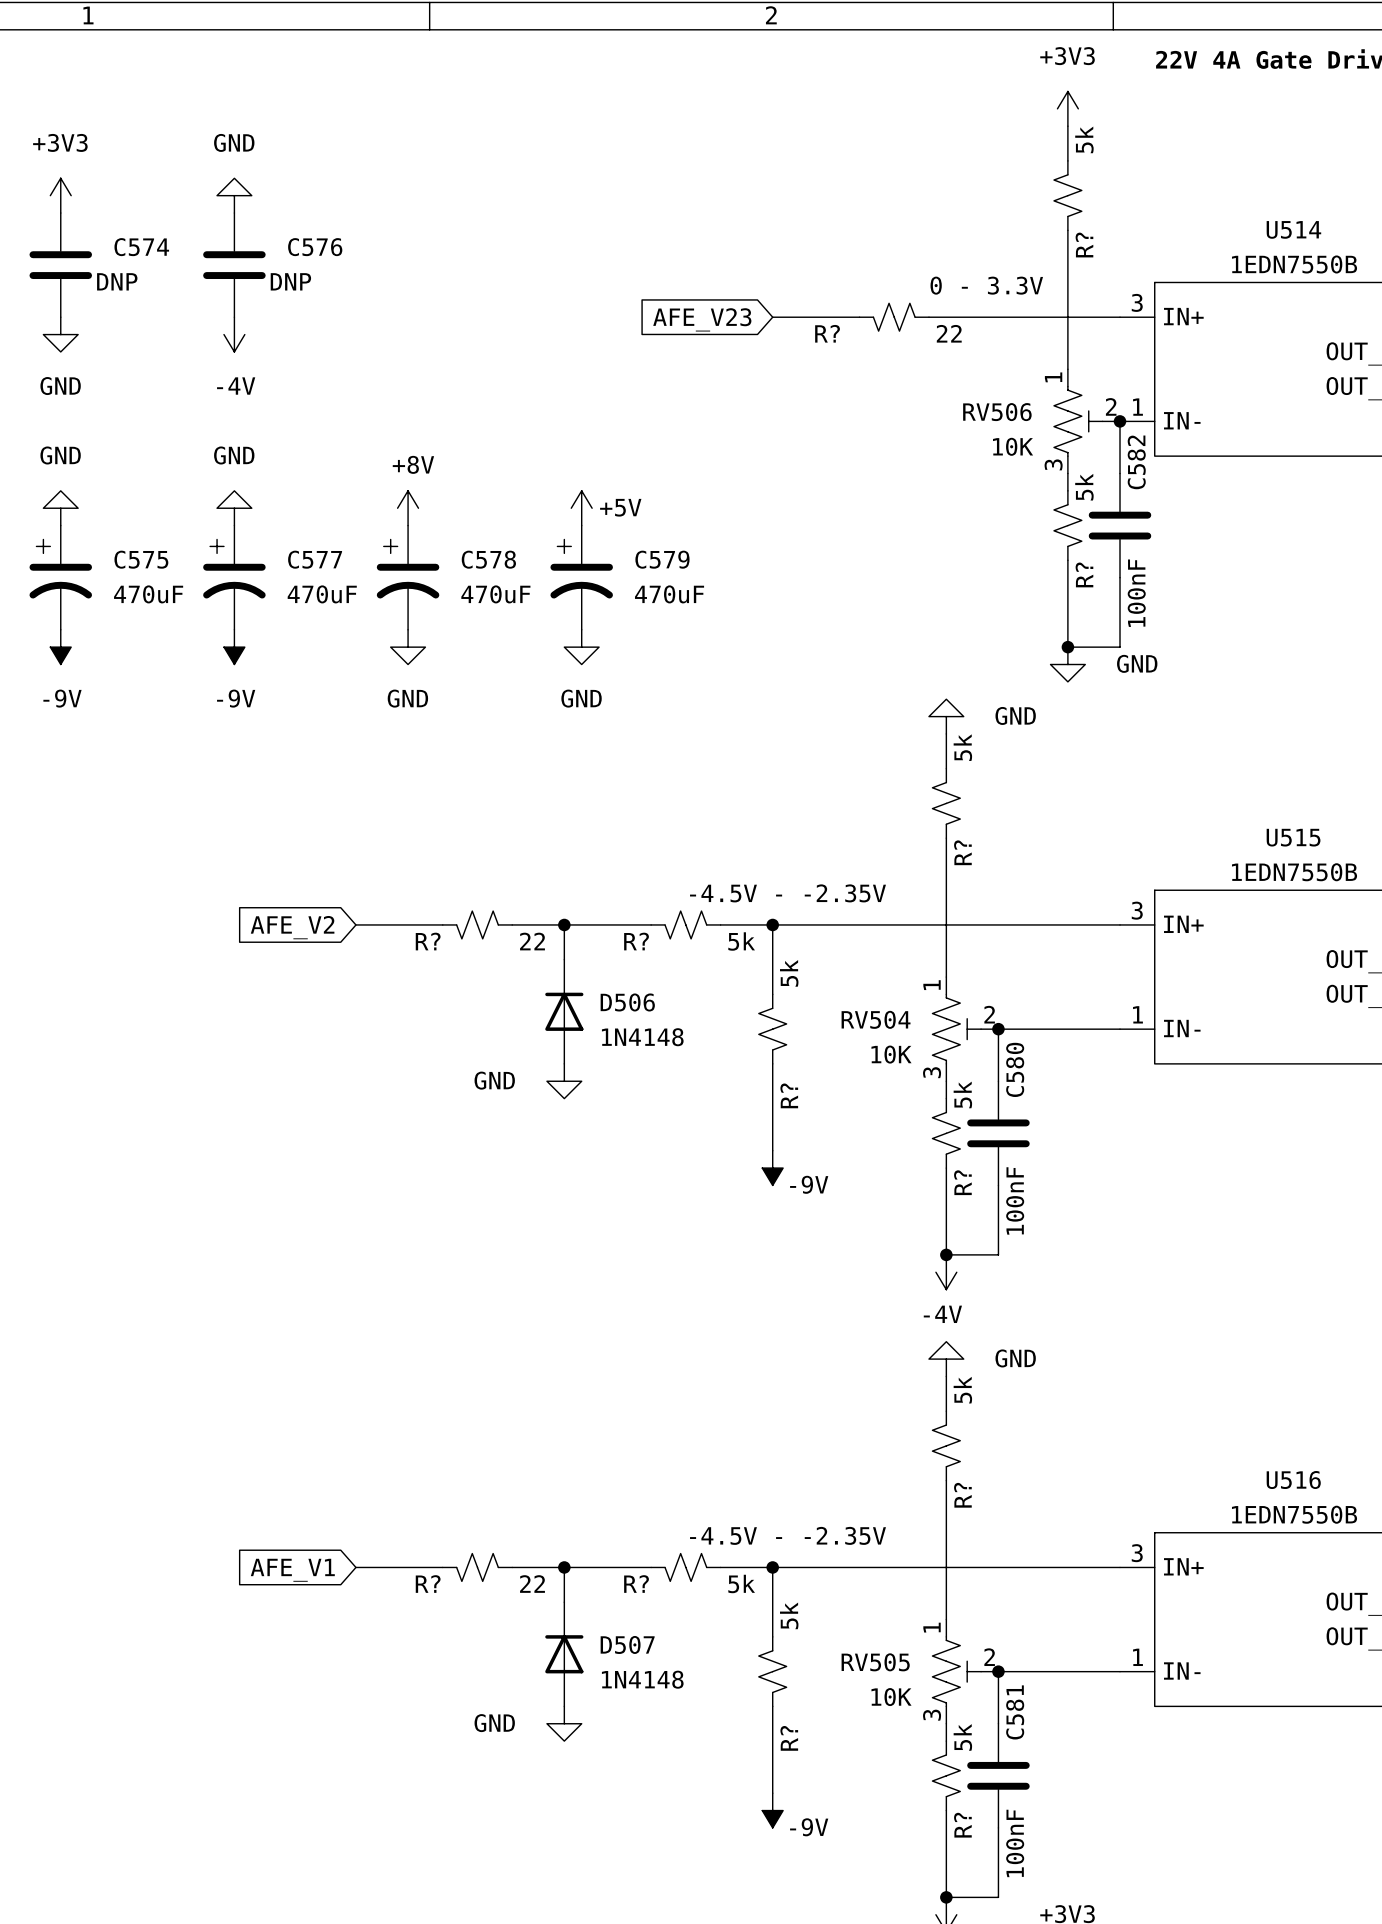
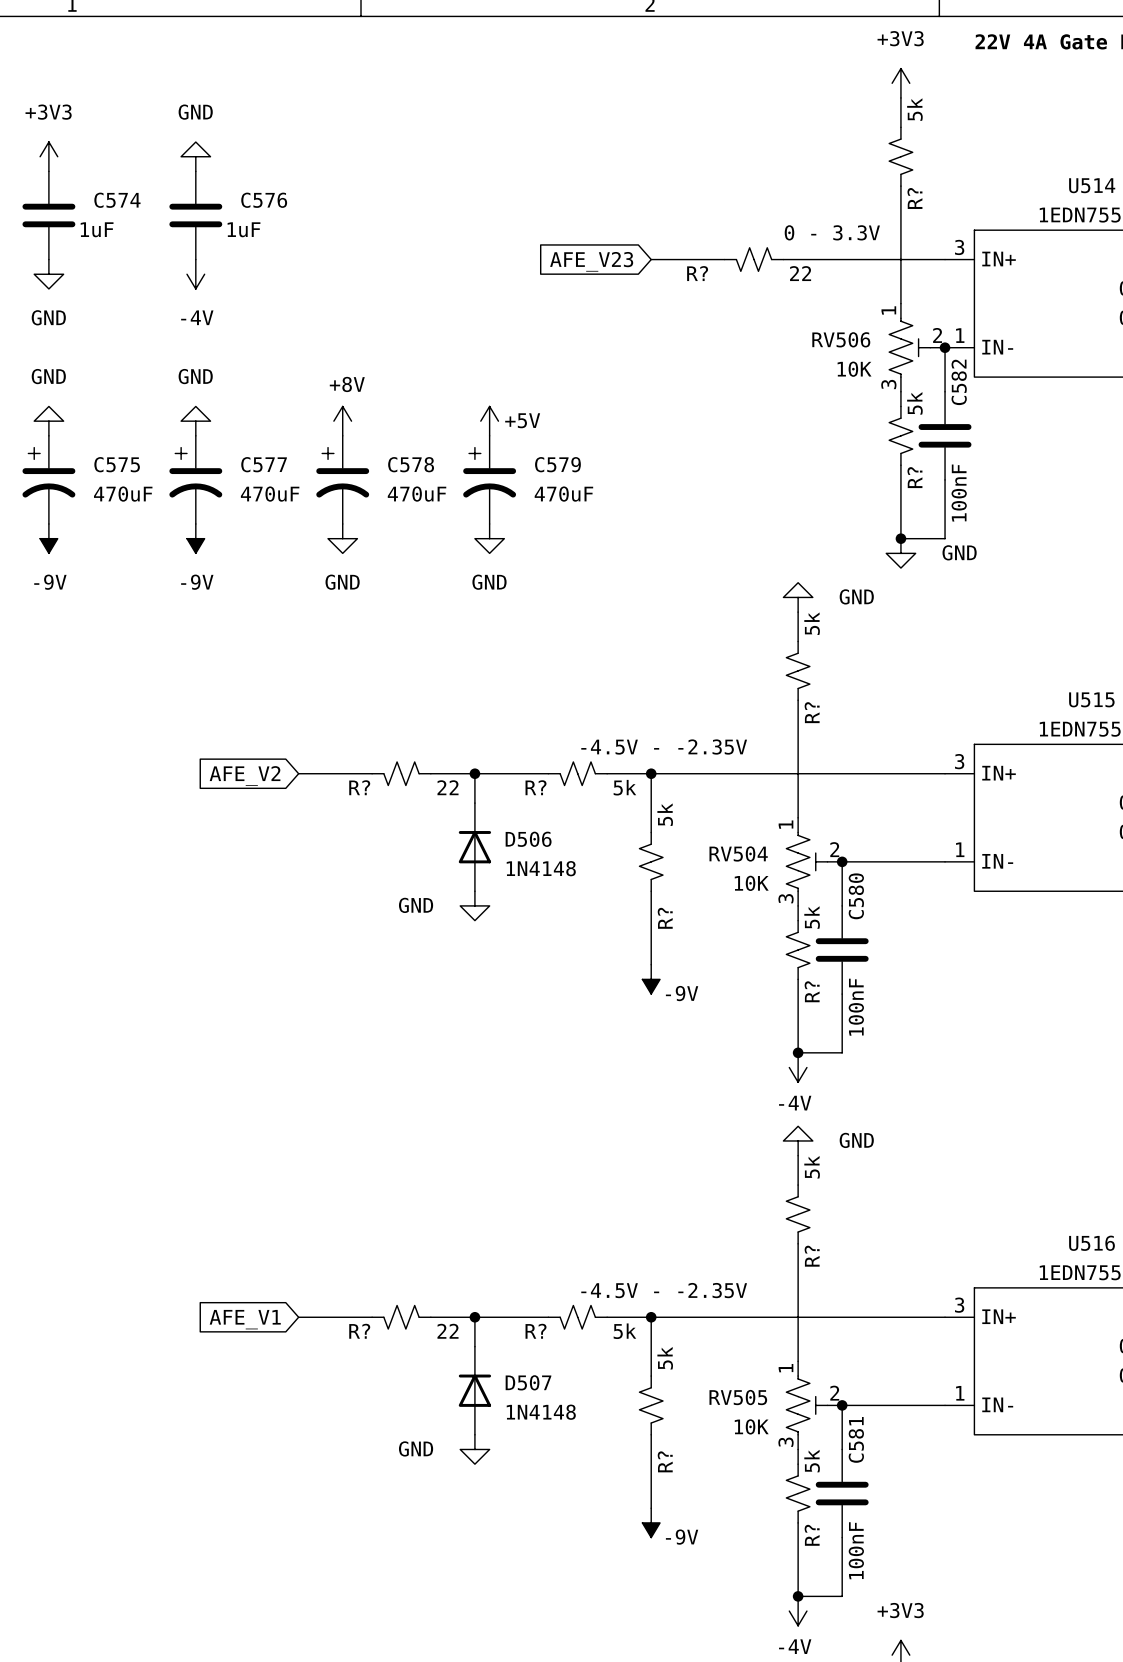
C574 value: DNP (117, 281) -> 1uF (97, 229)
C576 value: DNP (290, 281) -> 1uF (244, 229)

